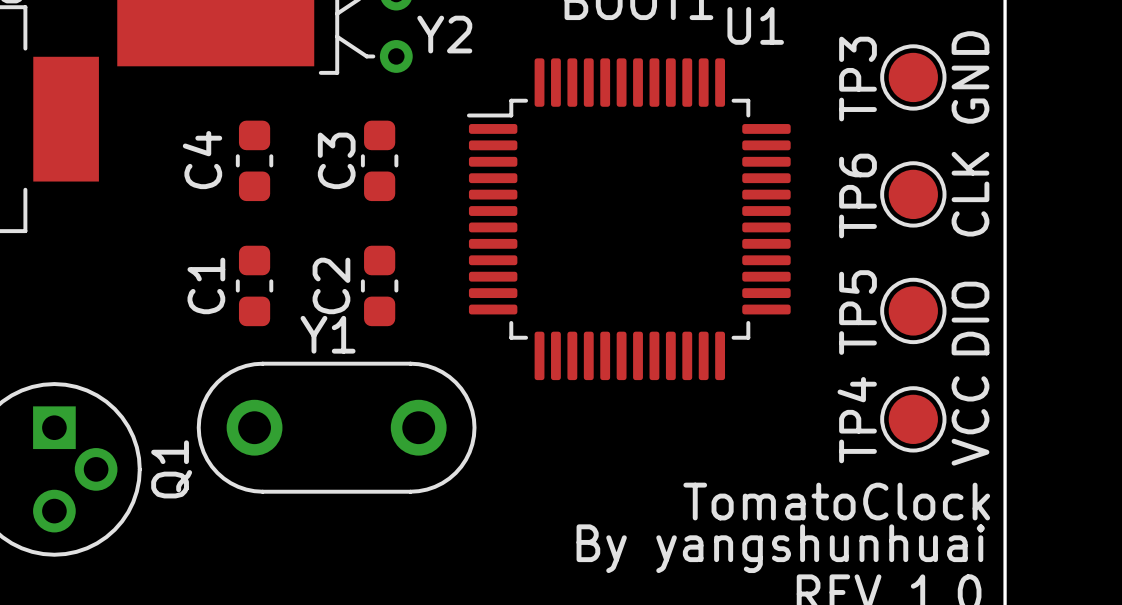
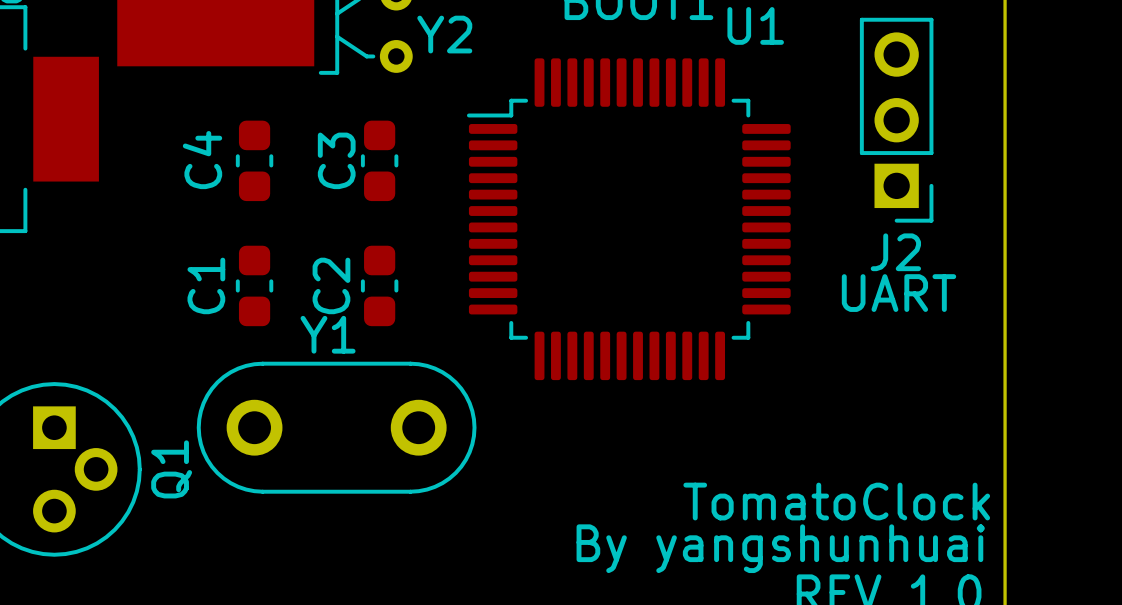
TP3: (913, 77) -> none
text: GND (970, 77) -> none
J2: none -> (896, 120)
TP6: (913, 194) -> none
text: CLK (970, 194) -> none
text: none -> UART (899, 293)
TP5: (913, 310) -> none
text: DIO (970, 318) -> none
TP4: (913, 419) -> none
text: VCC (970, 420) -> none

